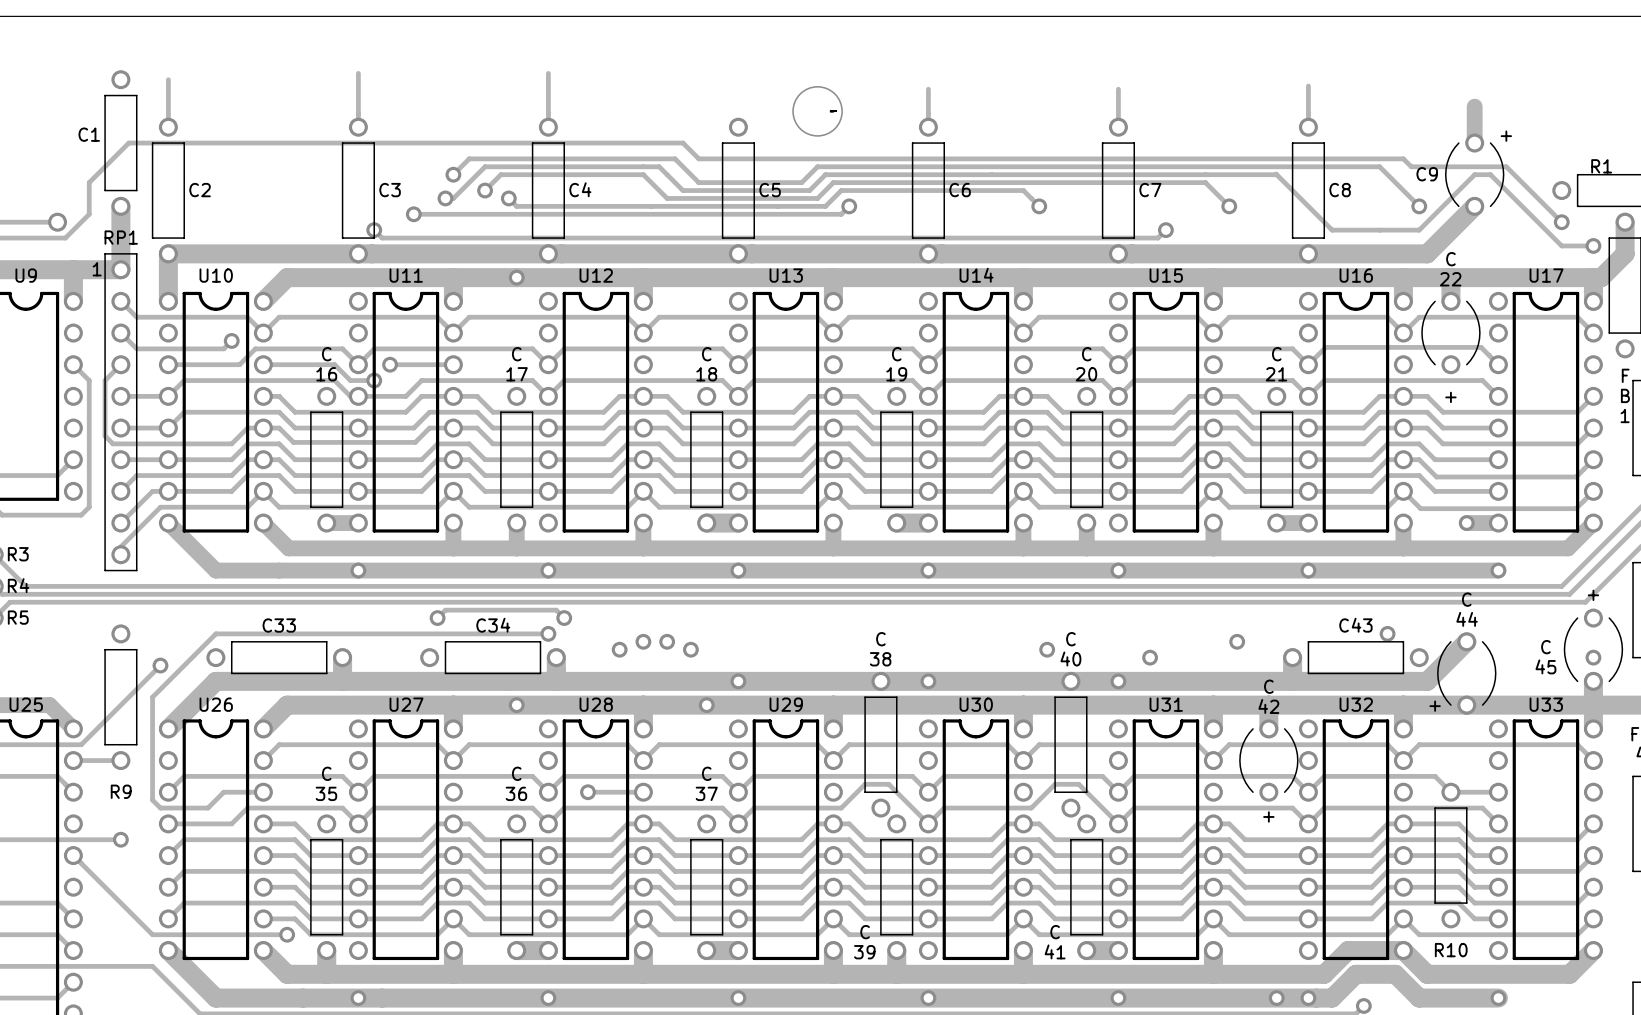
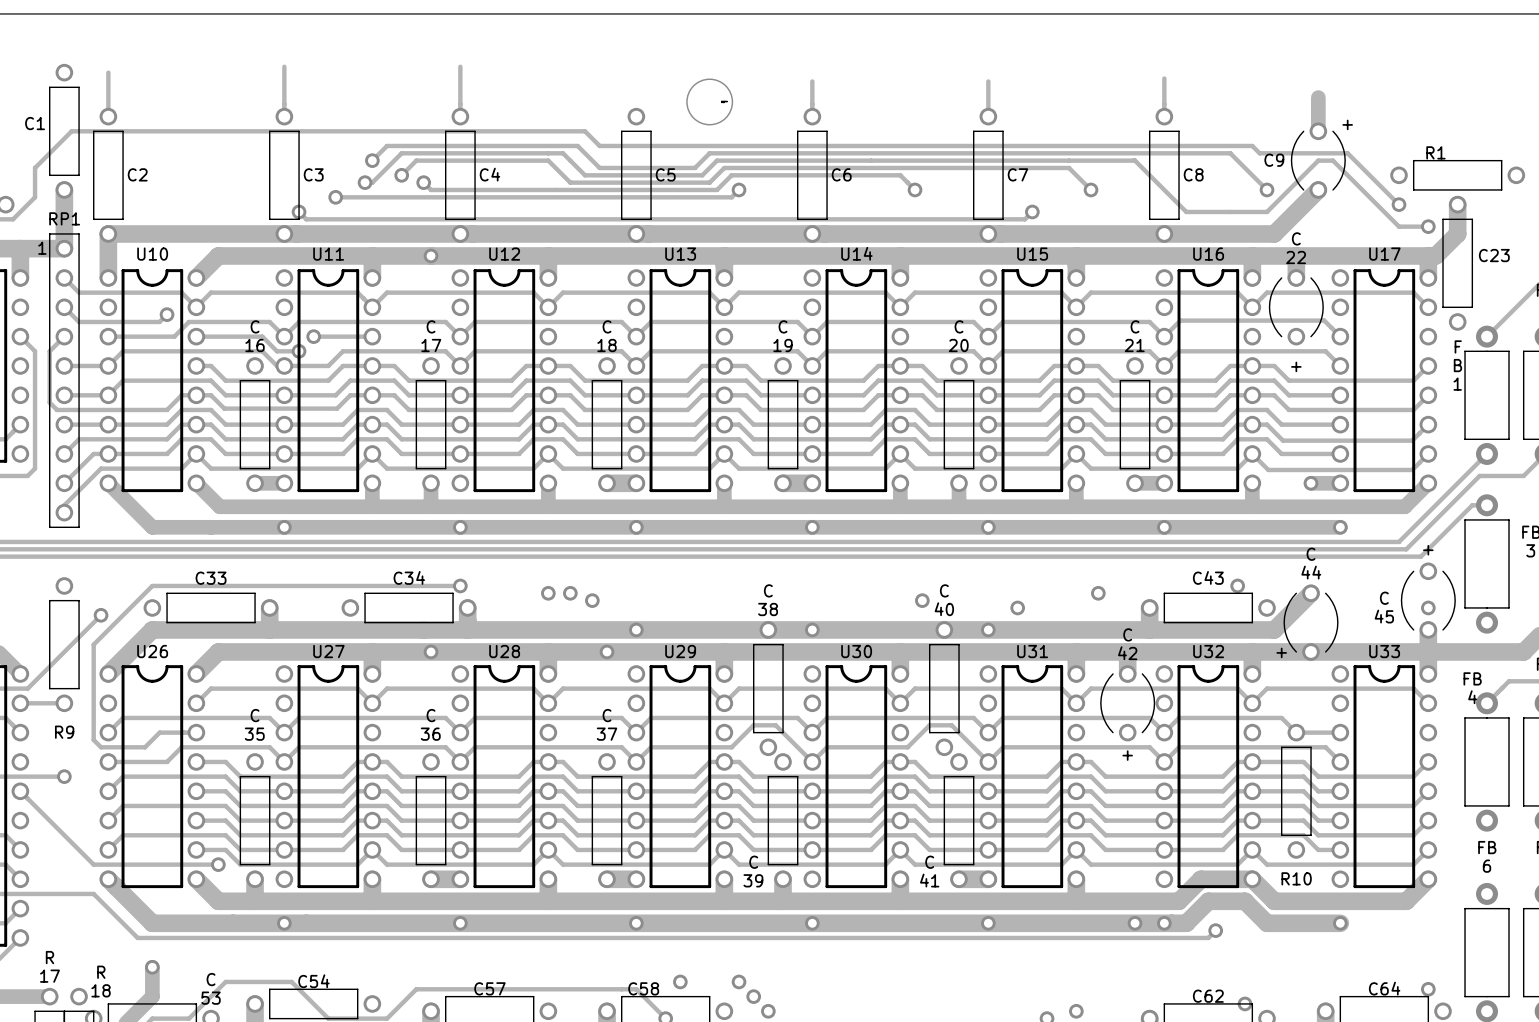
track: (437, 618) (445, 610) (556, 610) (564, 618) -> none
via: (437, 618) -> none
via: (564, 618) -> none
via: (619, 649) -> none
track: (587, 792) (643, 792) -> none
via: (587, 792) -> none

